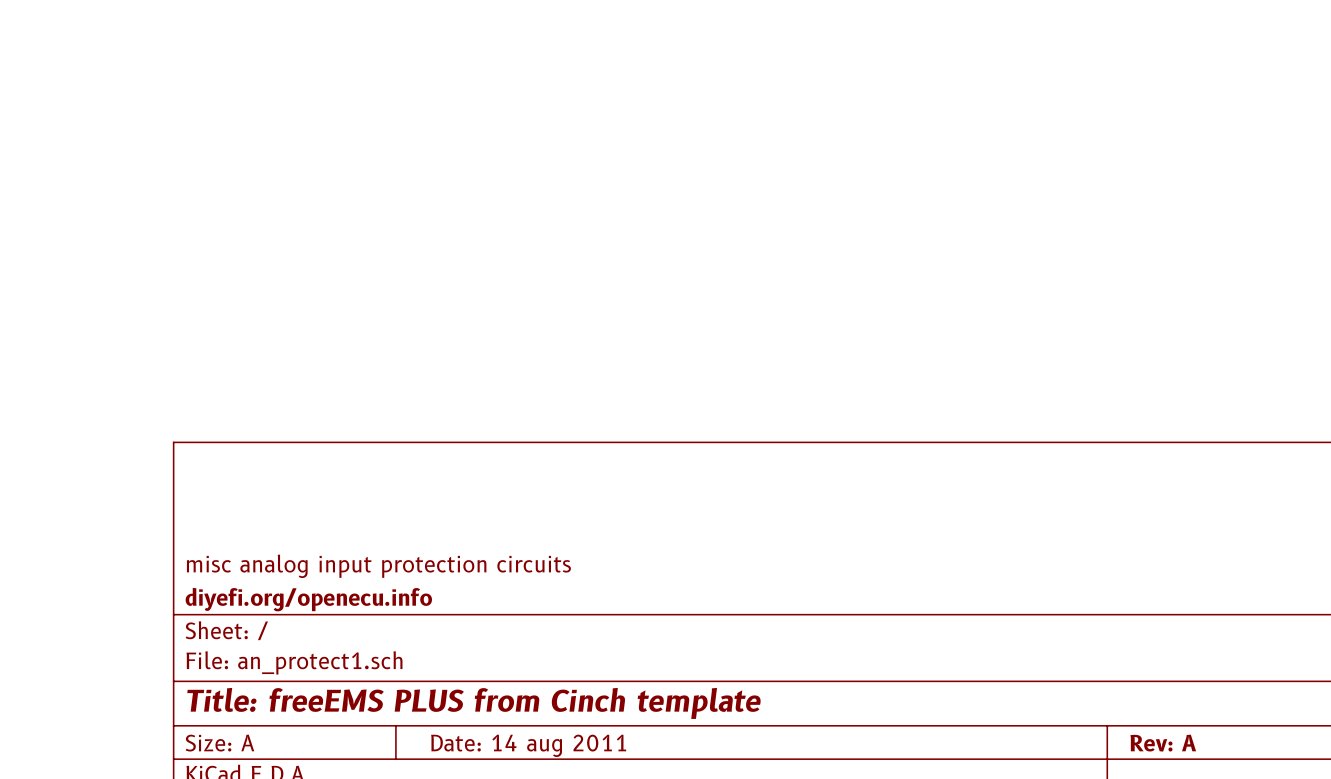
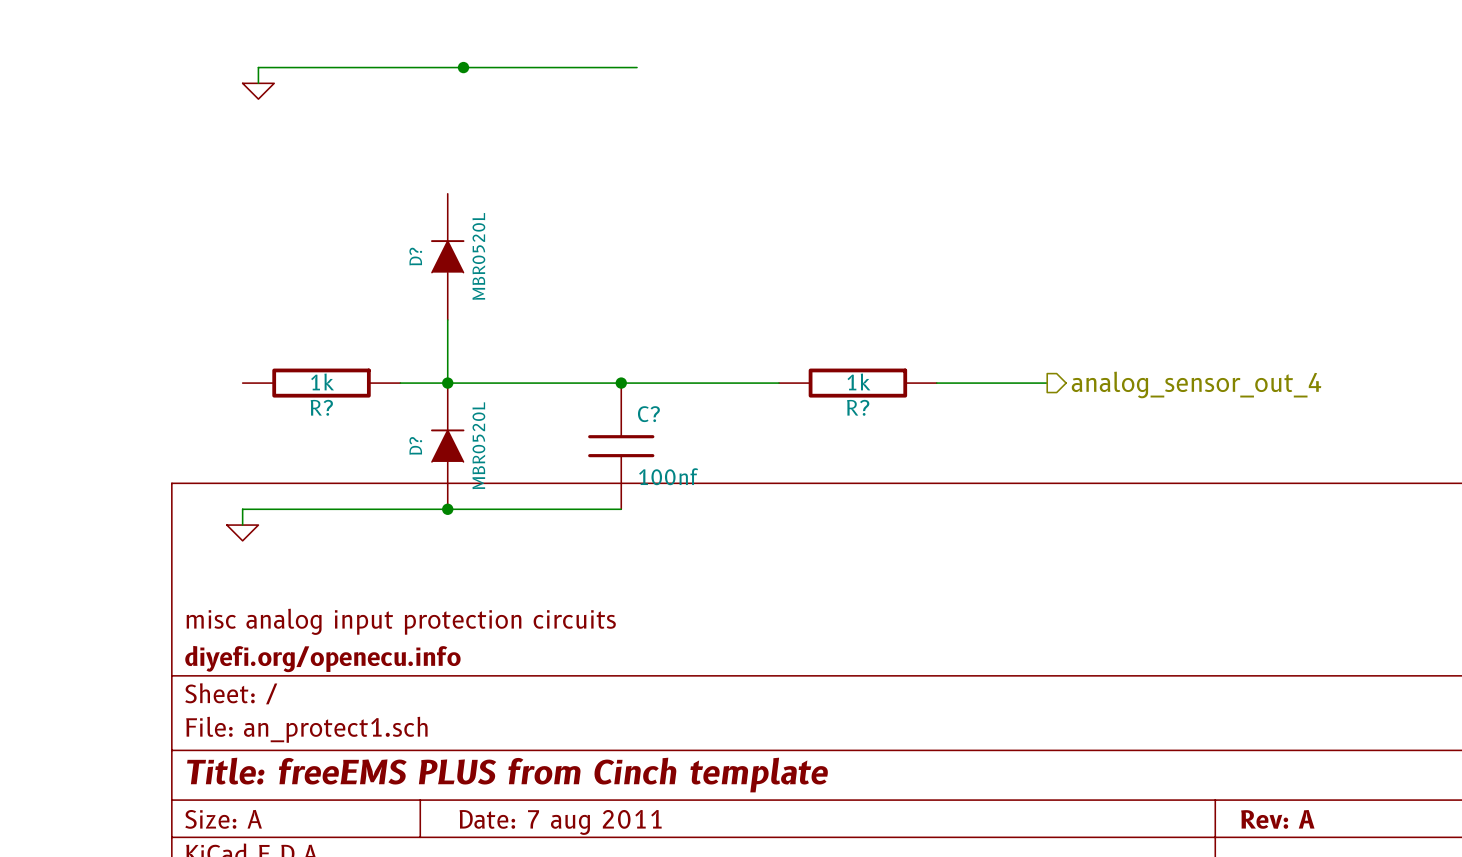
junction: none -> (463, 67)
wire: none -> (637, 67) (258, 67) (258, 83)
power symbol: none -> (258, 91)
D?: none -> MBR0520L (447, 256)
wire: none -> (447, 319) (447, 383)
R?: none -> 1k (321, 383)
wire: none -> (400, 383) (779, 383)
junction: none -> (447, 383)
junction: none -> (621, 383)
R?: none -> 1k (857, 383)
wire: none -> (936, 383) (1047, 383)
hierarchical label: none -> analog_sensor_out_4 (1196, 384)
D?: none -> MBR0520L (447, 446)
C?: none -> 100nf (621, 446)
junction: none -> (447, 509)
wire: none -> (621, 509) (242, 509) (242, 525)
power symbol: none -> (242, 532)
title block: Date: 14 aug 2011 (528, 745) -> Date: 7 aug 2011 (560, 822)

